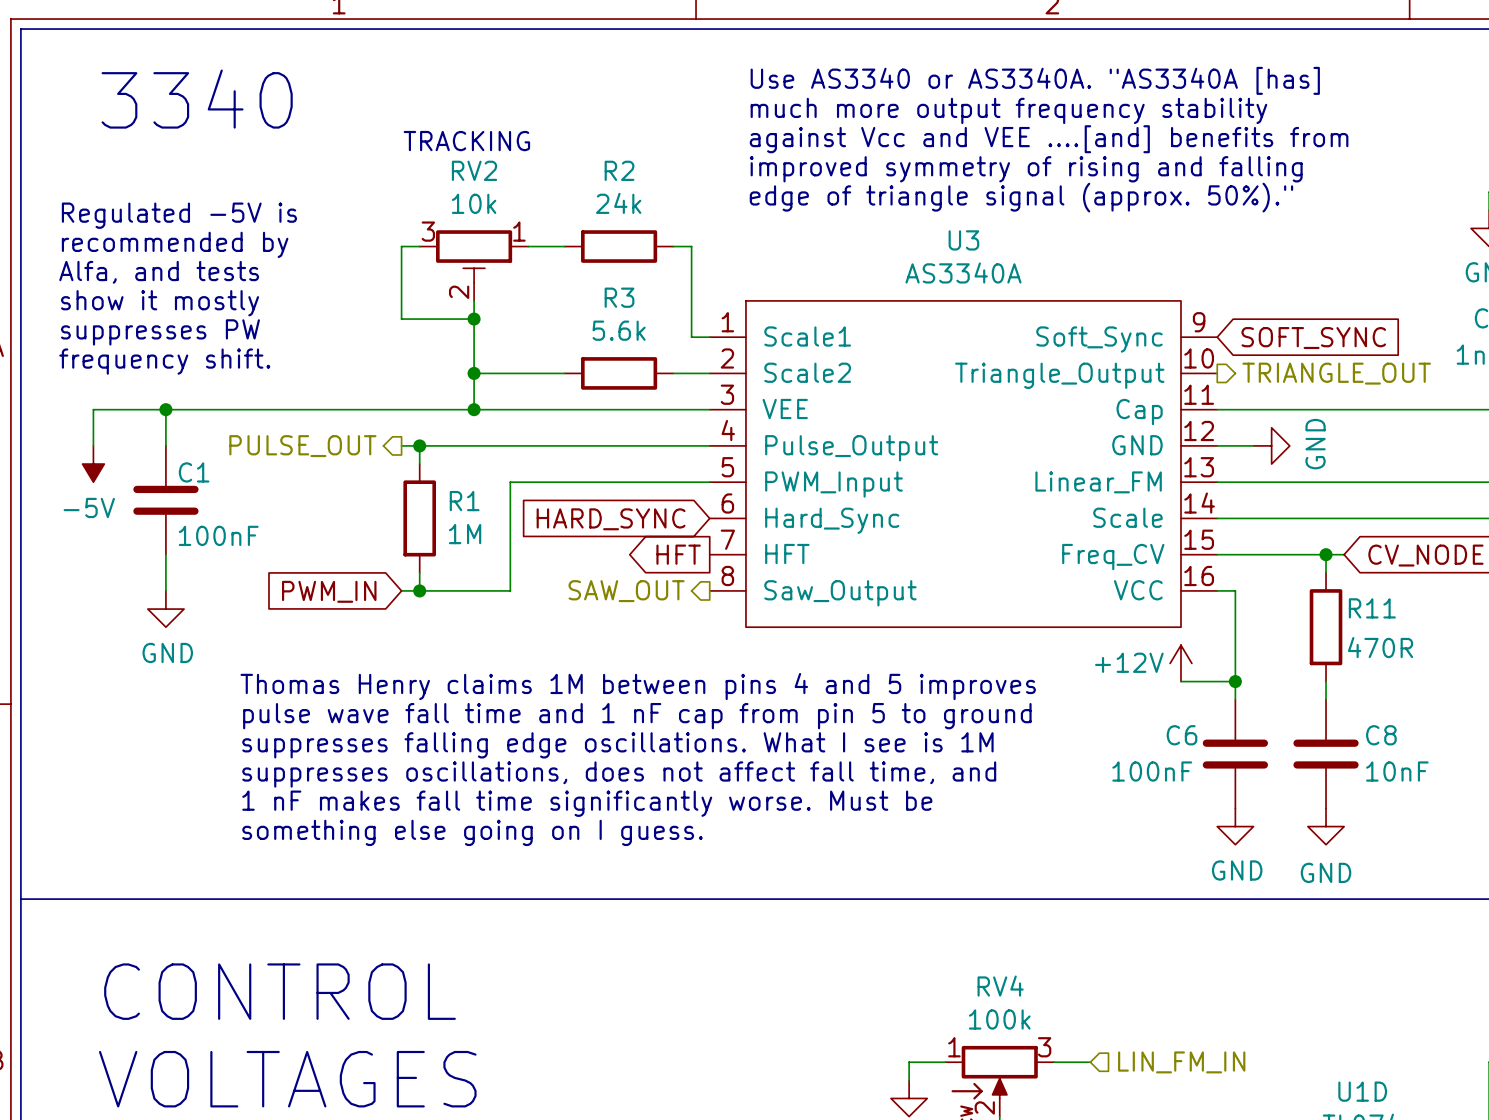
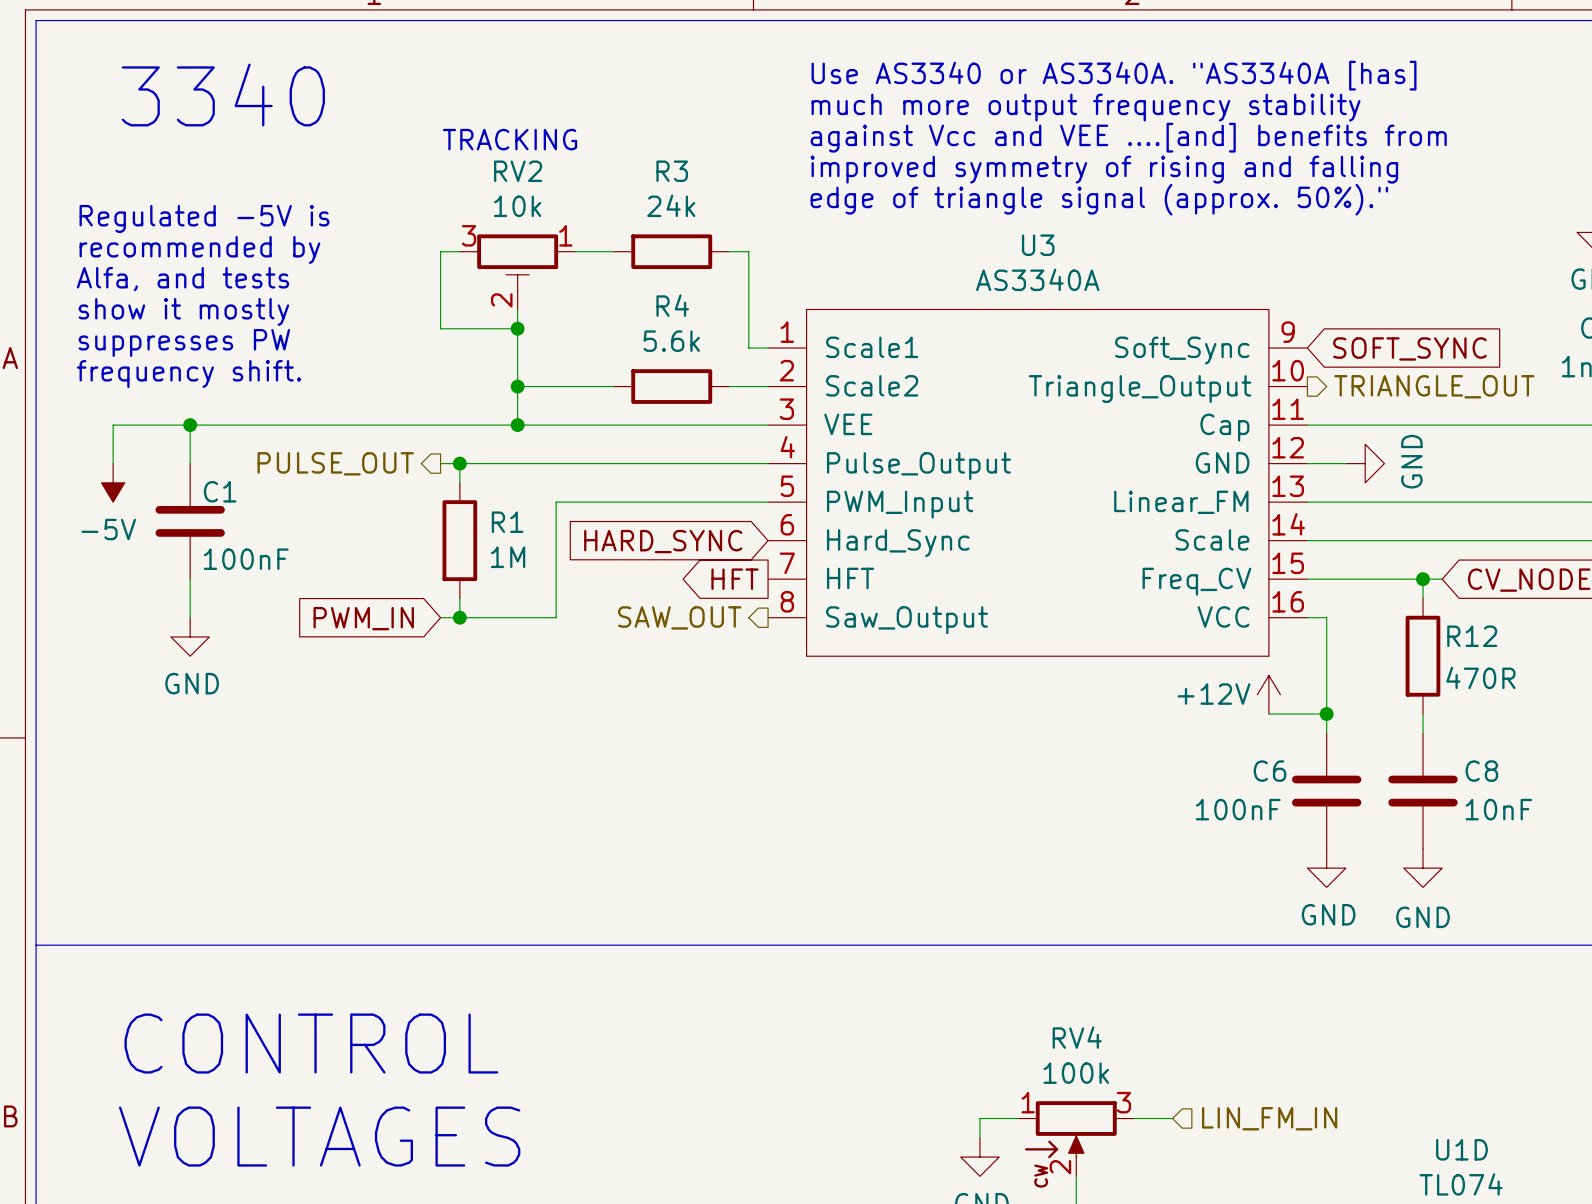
R2 name: R2 (619, 170) -> R3 (672, 171)
R3 name: R3 (619, 297) -> R4 (672, 305)
R11 name: R11 (1372, 608) -> R12 (1472, 636)
text: Thomas Henry claims 1M between pins 4 and 5 improves (638, 686) -> none
text: pulse wave fall time and 1 nF cap from pin 5 to ground (637, 716) -> none
text: suppresses falling edge oscillations. What I see is 1M (617, 745) -> none
text: suppresses oscillations, does not affect fall time, and (619, 774) -> none
text: 1 nF makes fall time significantly worse. Must be (587, 803) -> none
text: something else going on I guess. (472, 832) -> none

